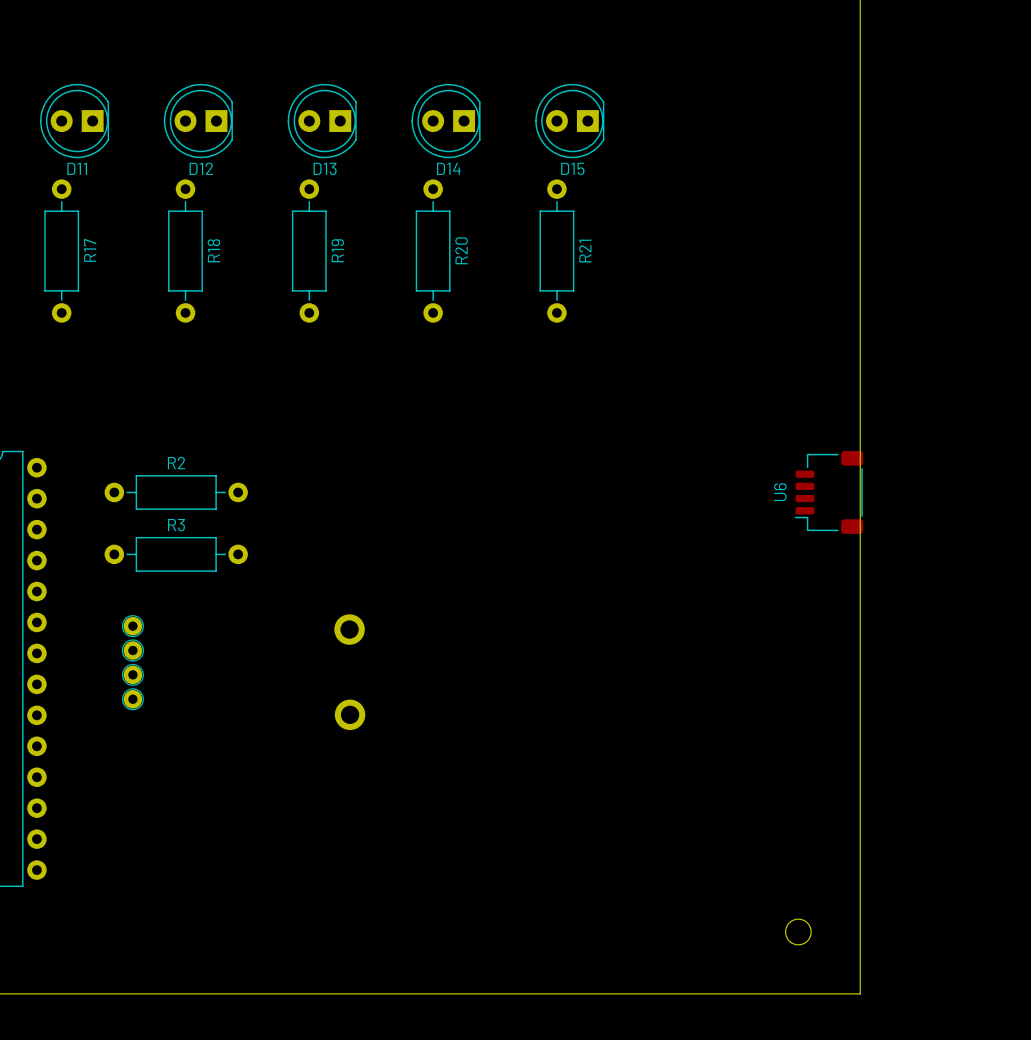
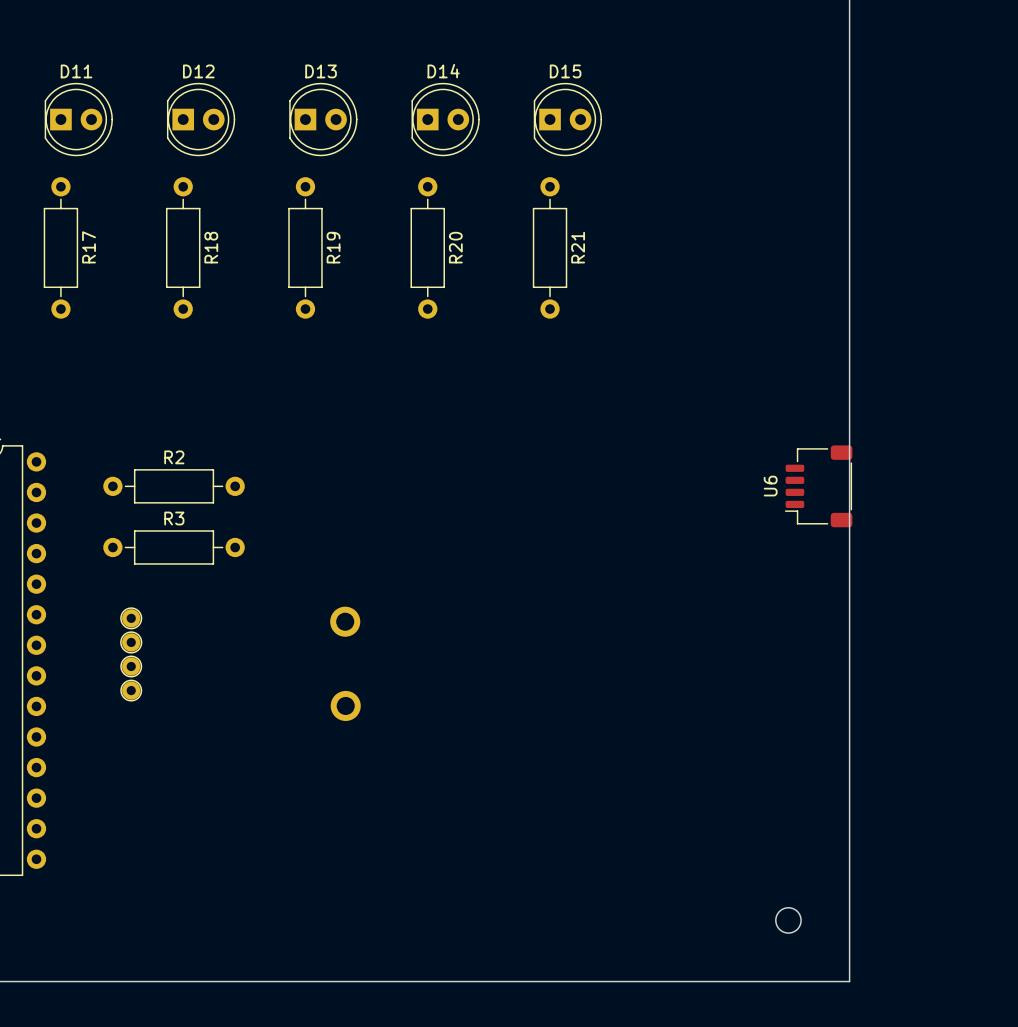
D11 rotation: 0° (74, 121) -> 180° (78, 119)
D12 rotation: 0° (198, 121) -> 180° (201, 119)
D13 rotation: 0° (322, 121) -> 180° (323, 119)
D14 rotation: 0° (445, 121) -> 180° (445, 119)
D15 rotation: 0° (569, 121) -> 180° (567, 119)

